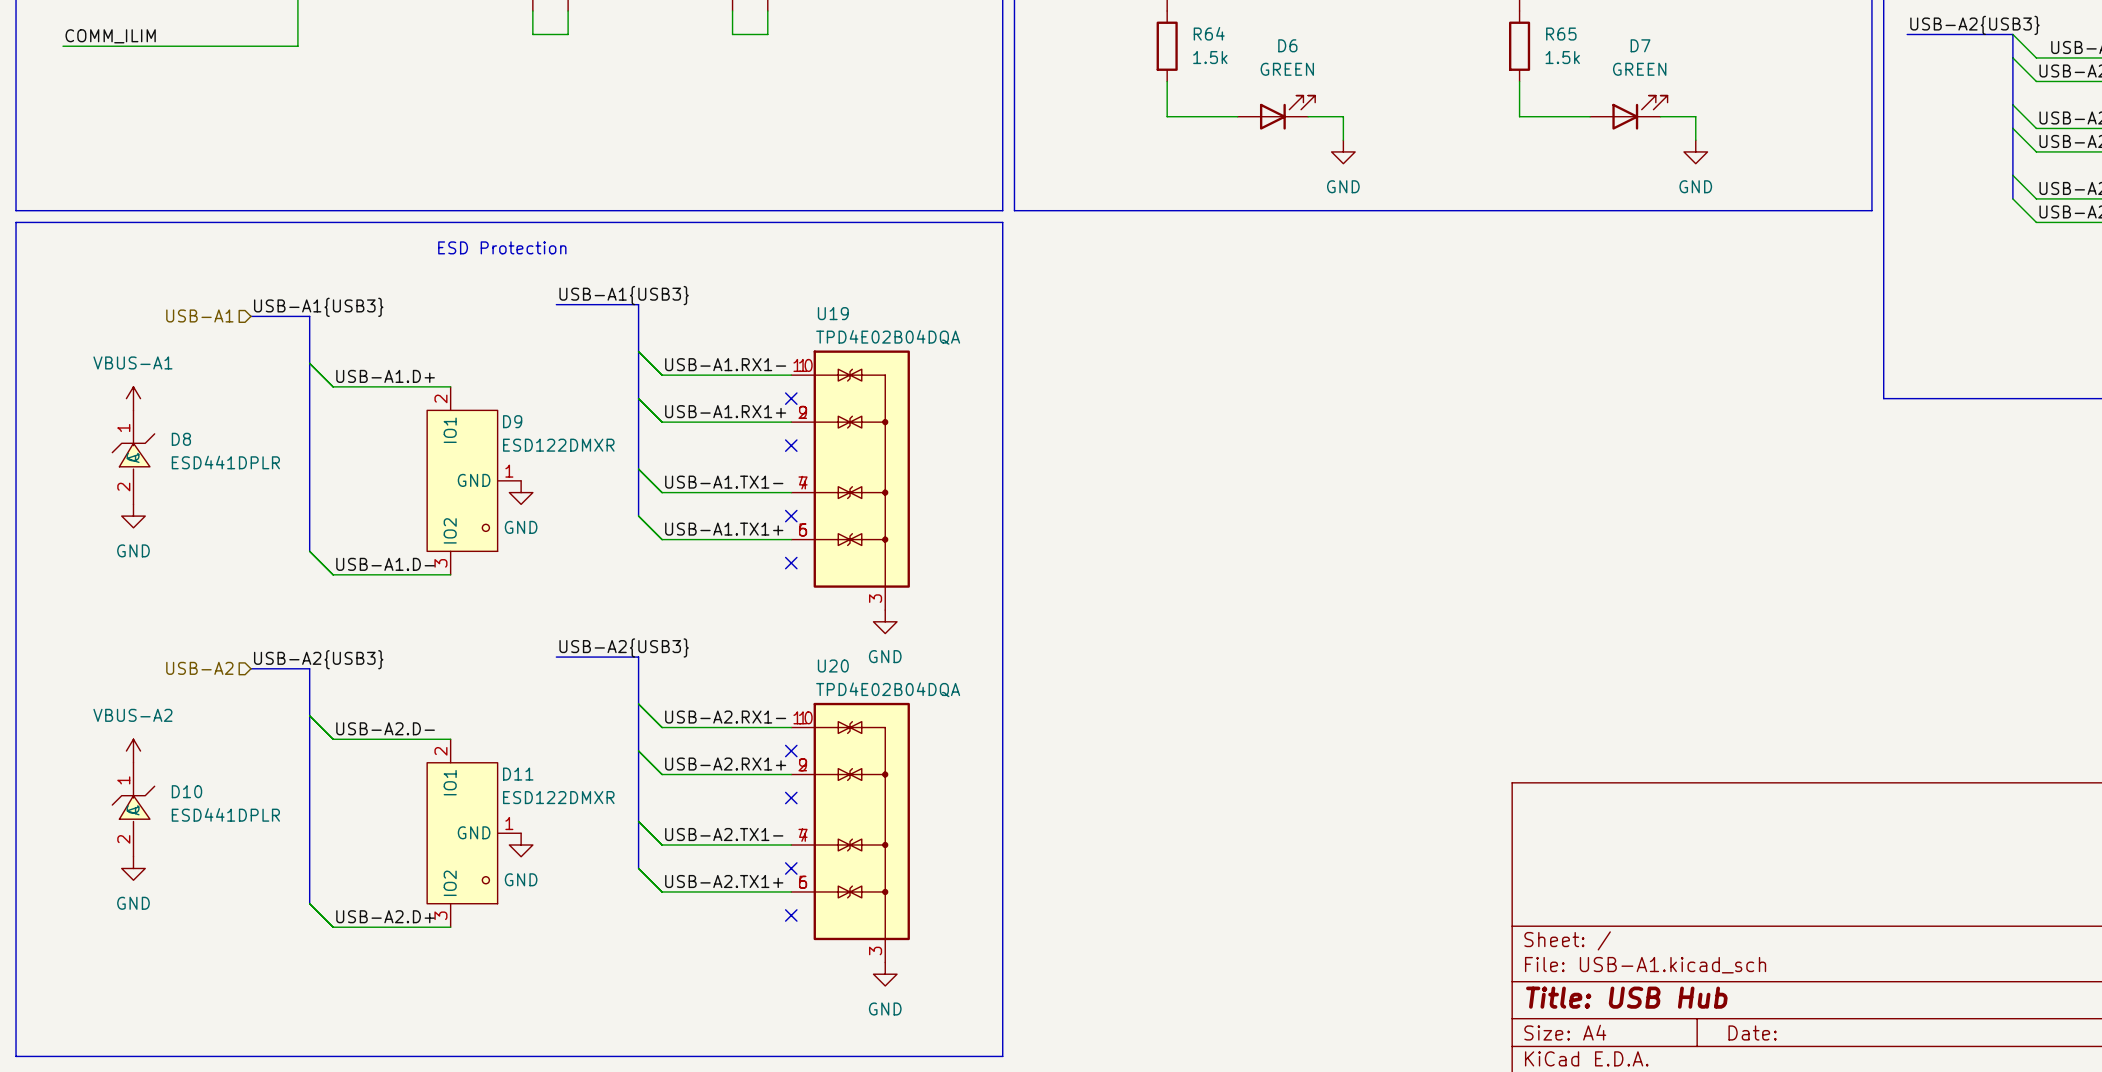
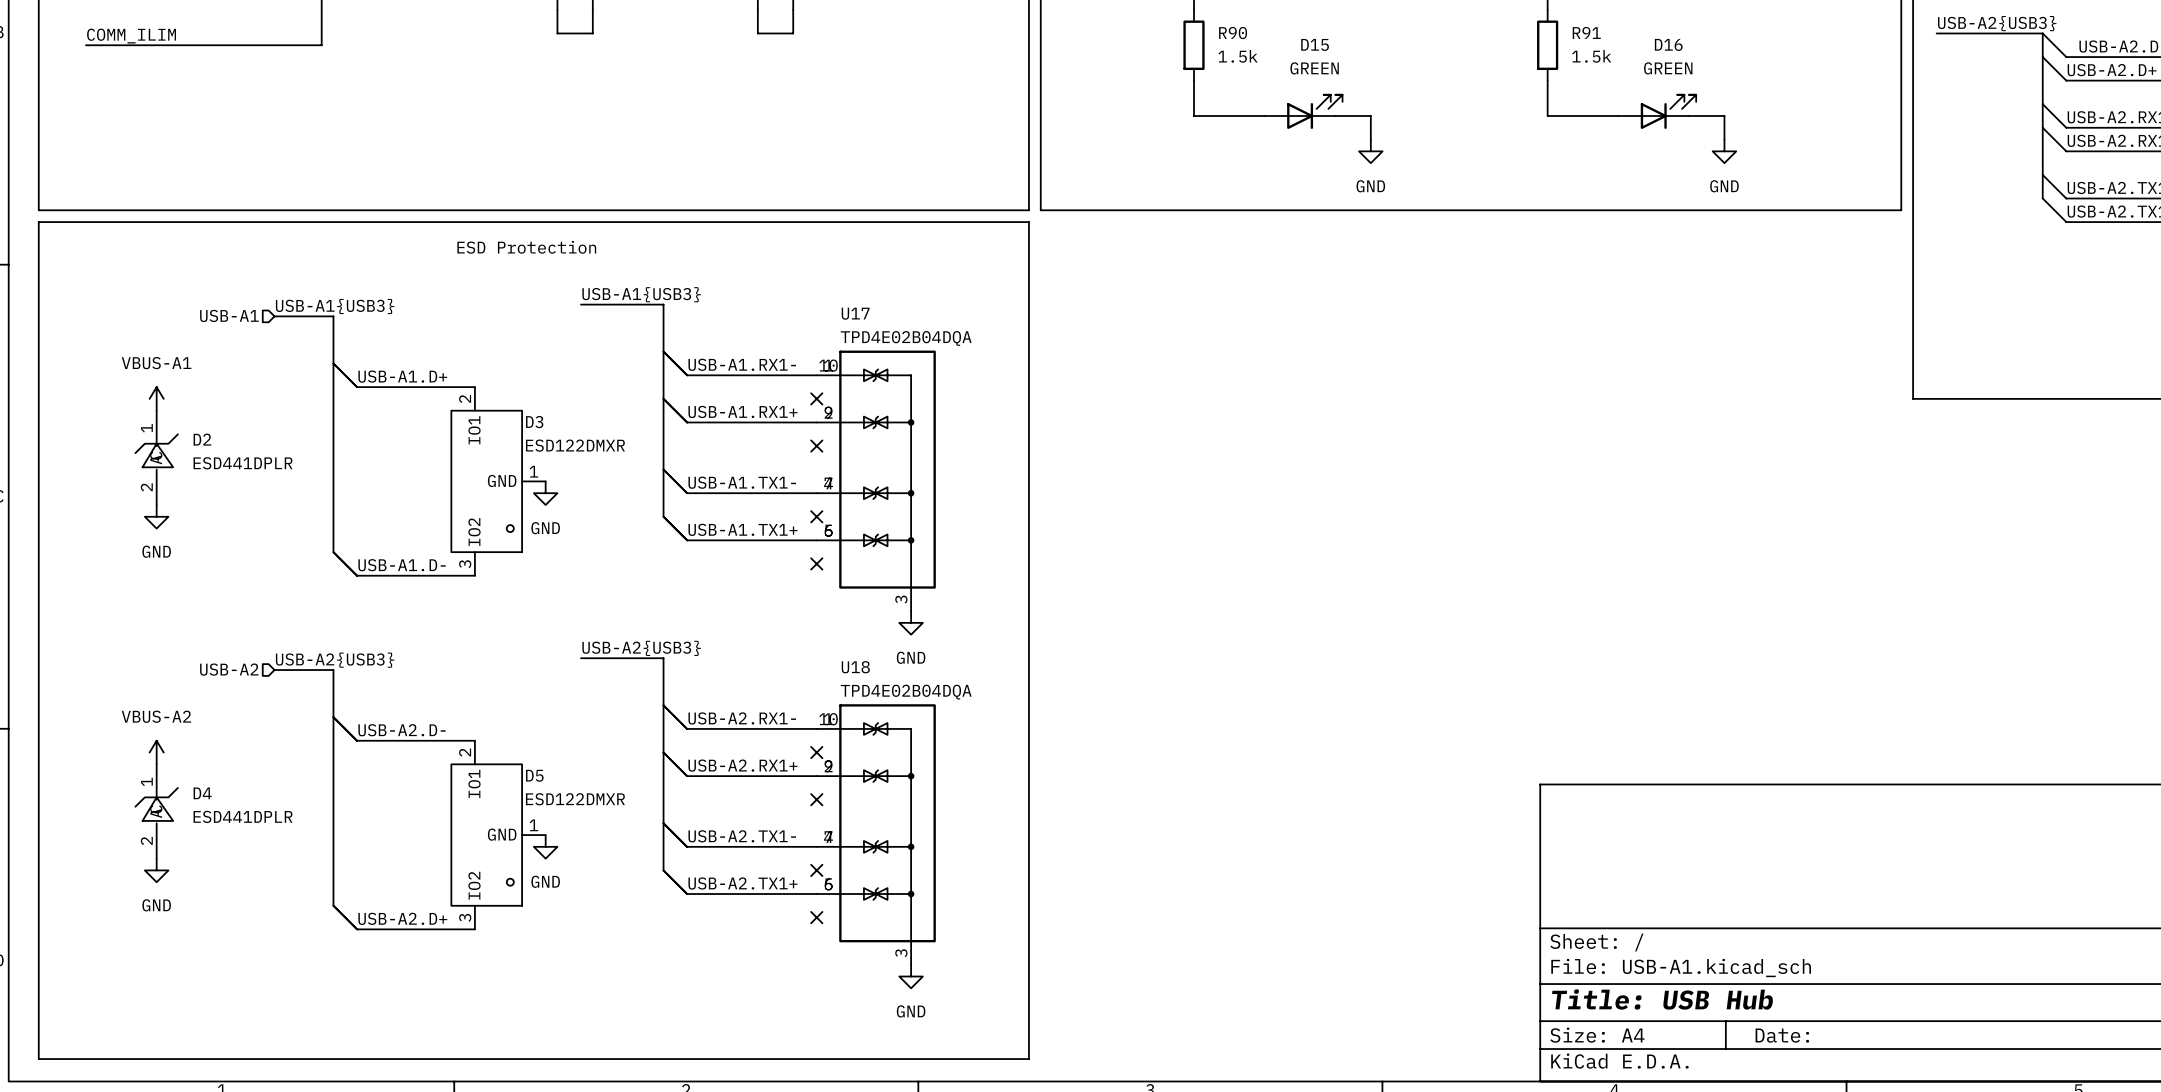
R64 name: R64 (1209, 33) -> R90 (1233, 33)
R65 name: R65 (1561, 34) -> R91 (1586, 32)
D6 name: D6 (1287, 45) -> D15 (1315, 44)
D7 name: D7 (1640, 45) -> D16 (1668, 44)
U19 name: U19 (833, 313) -> U17 (855, 313)
D9 name: D9 (512, 421) -> D3 (534, 422)
D8 name: D8 (181, 439) -> D2 (202, 439)
U20 name: U20 (833, 666) -> U18 (855, 667)
D11 name: D11 (518, 774) -> D5 (534, 775)
D10 name: D10 (186, 791) -> D4 (202, 793)

